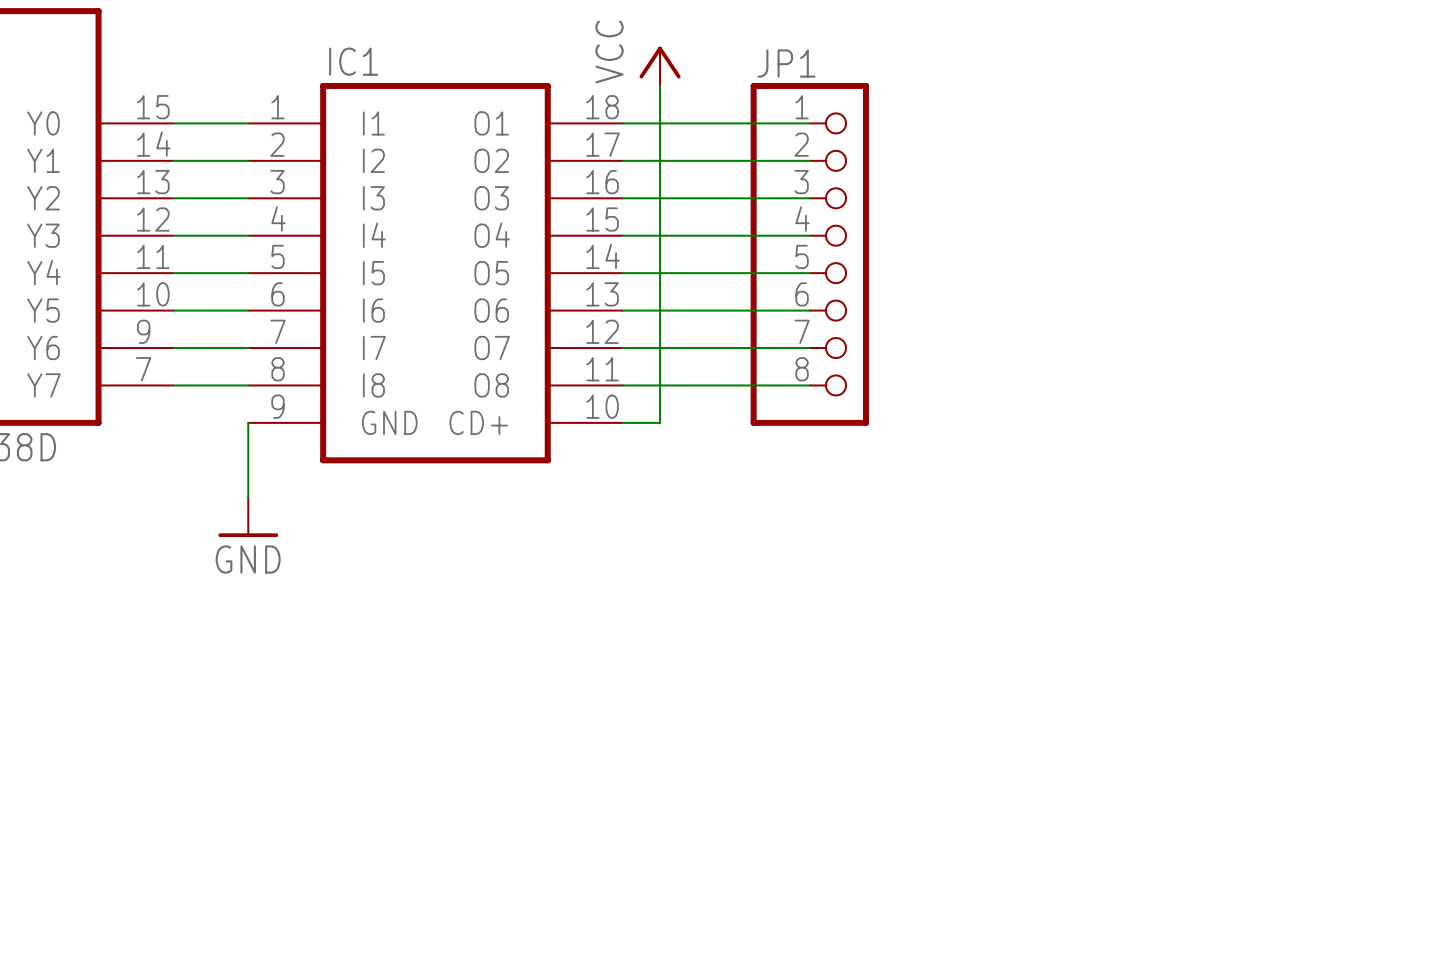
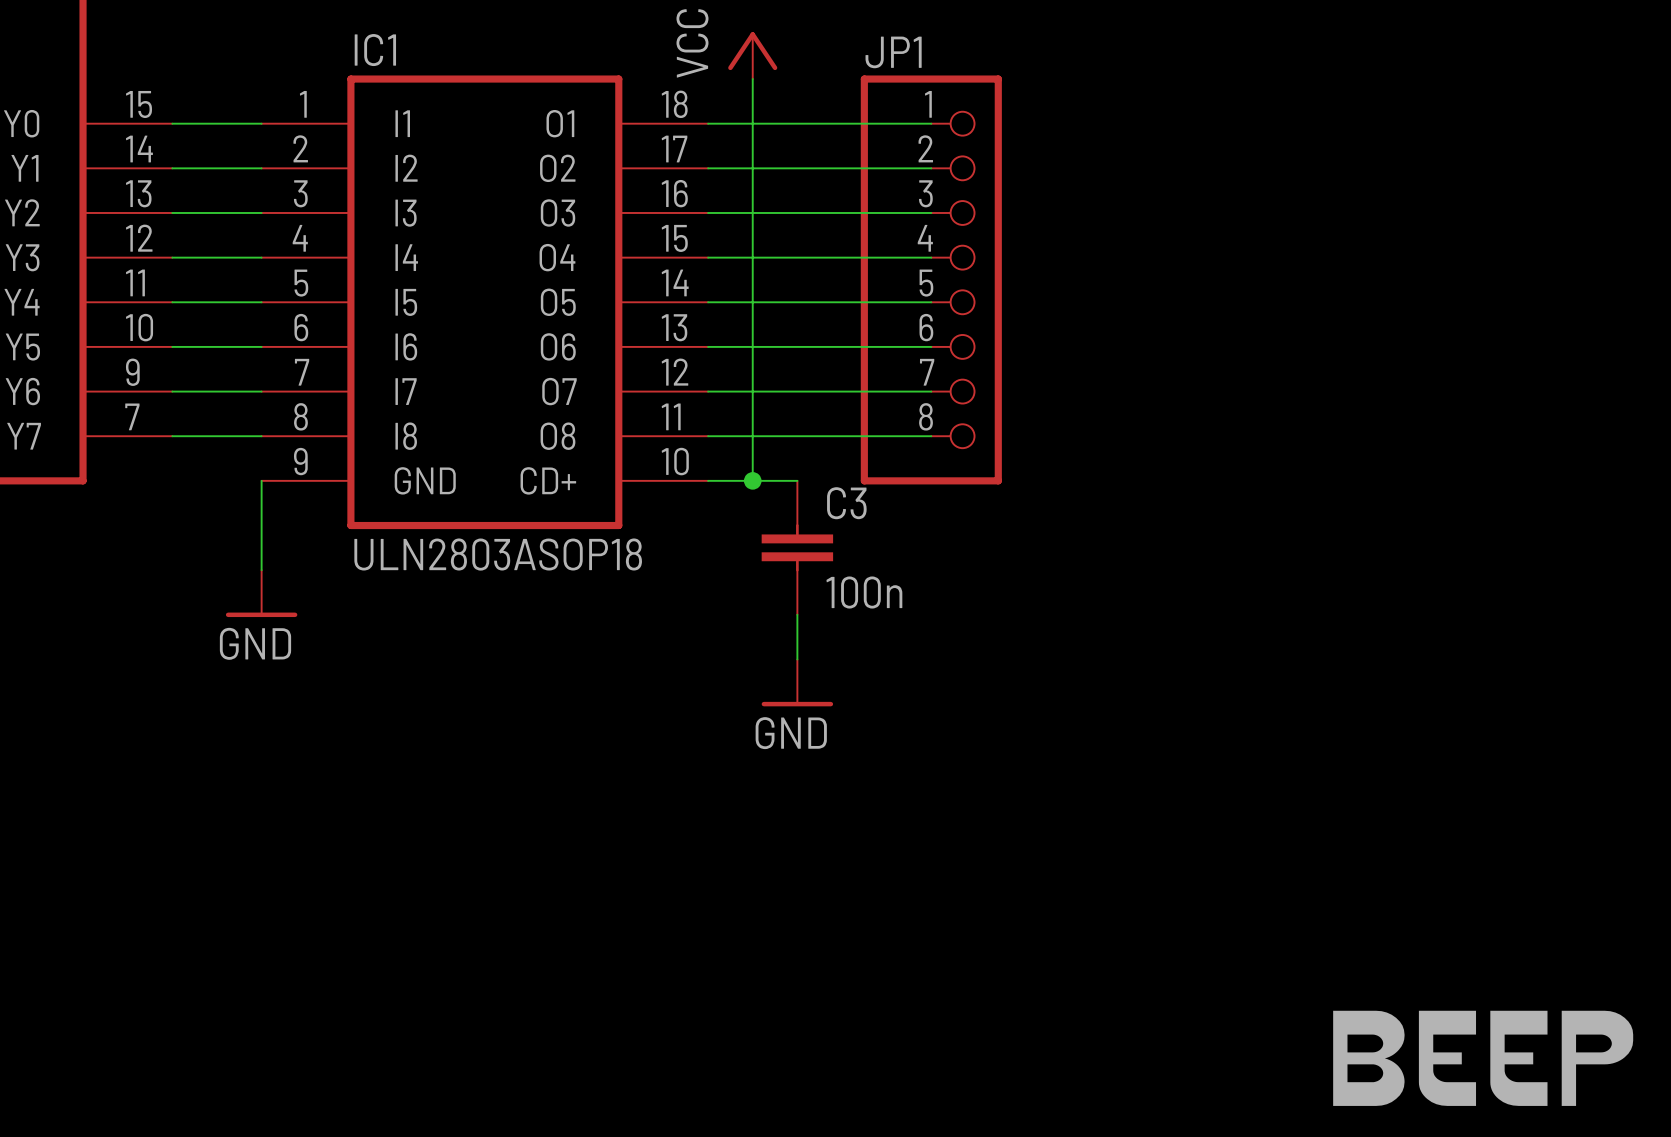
wire: none -> (752, 480) (797, 480)
junction: none -> (752, 480)
C3: none -> 100n (797, 547)
IC1 value: none -> ULN2803ASOP18 (498, 554)
wire: none -> (797, 614) (797, 659)
power symbol: none -> GND (797, 682)
part: none -> (1483, 1058)

